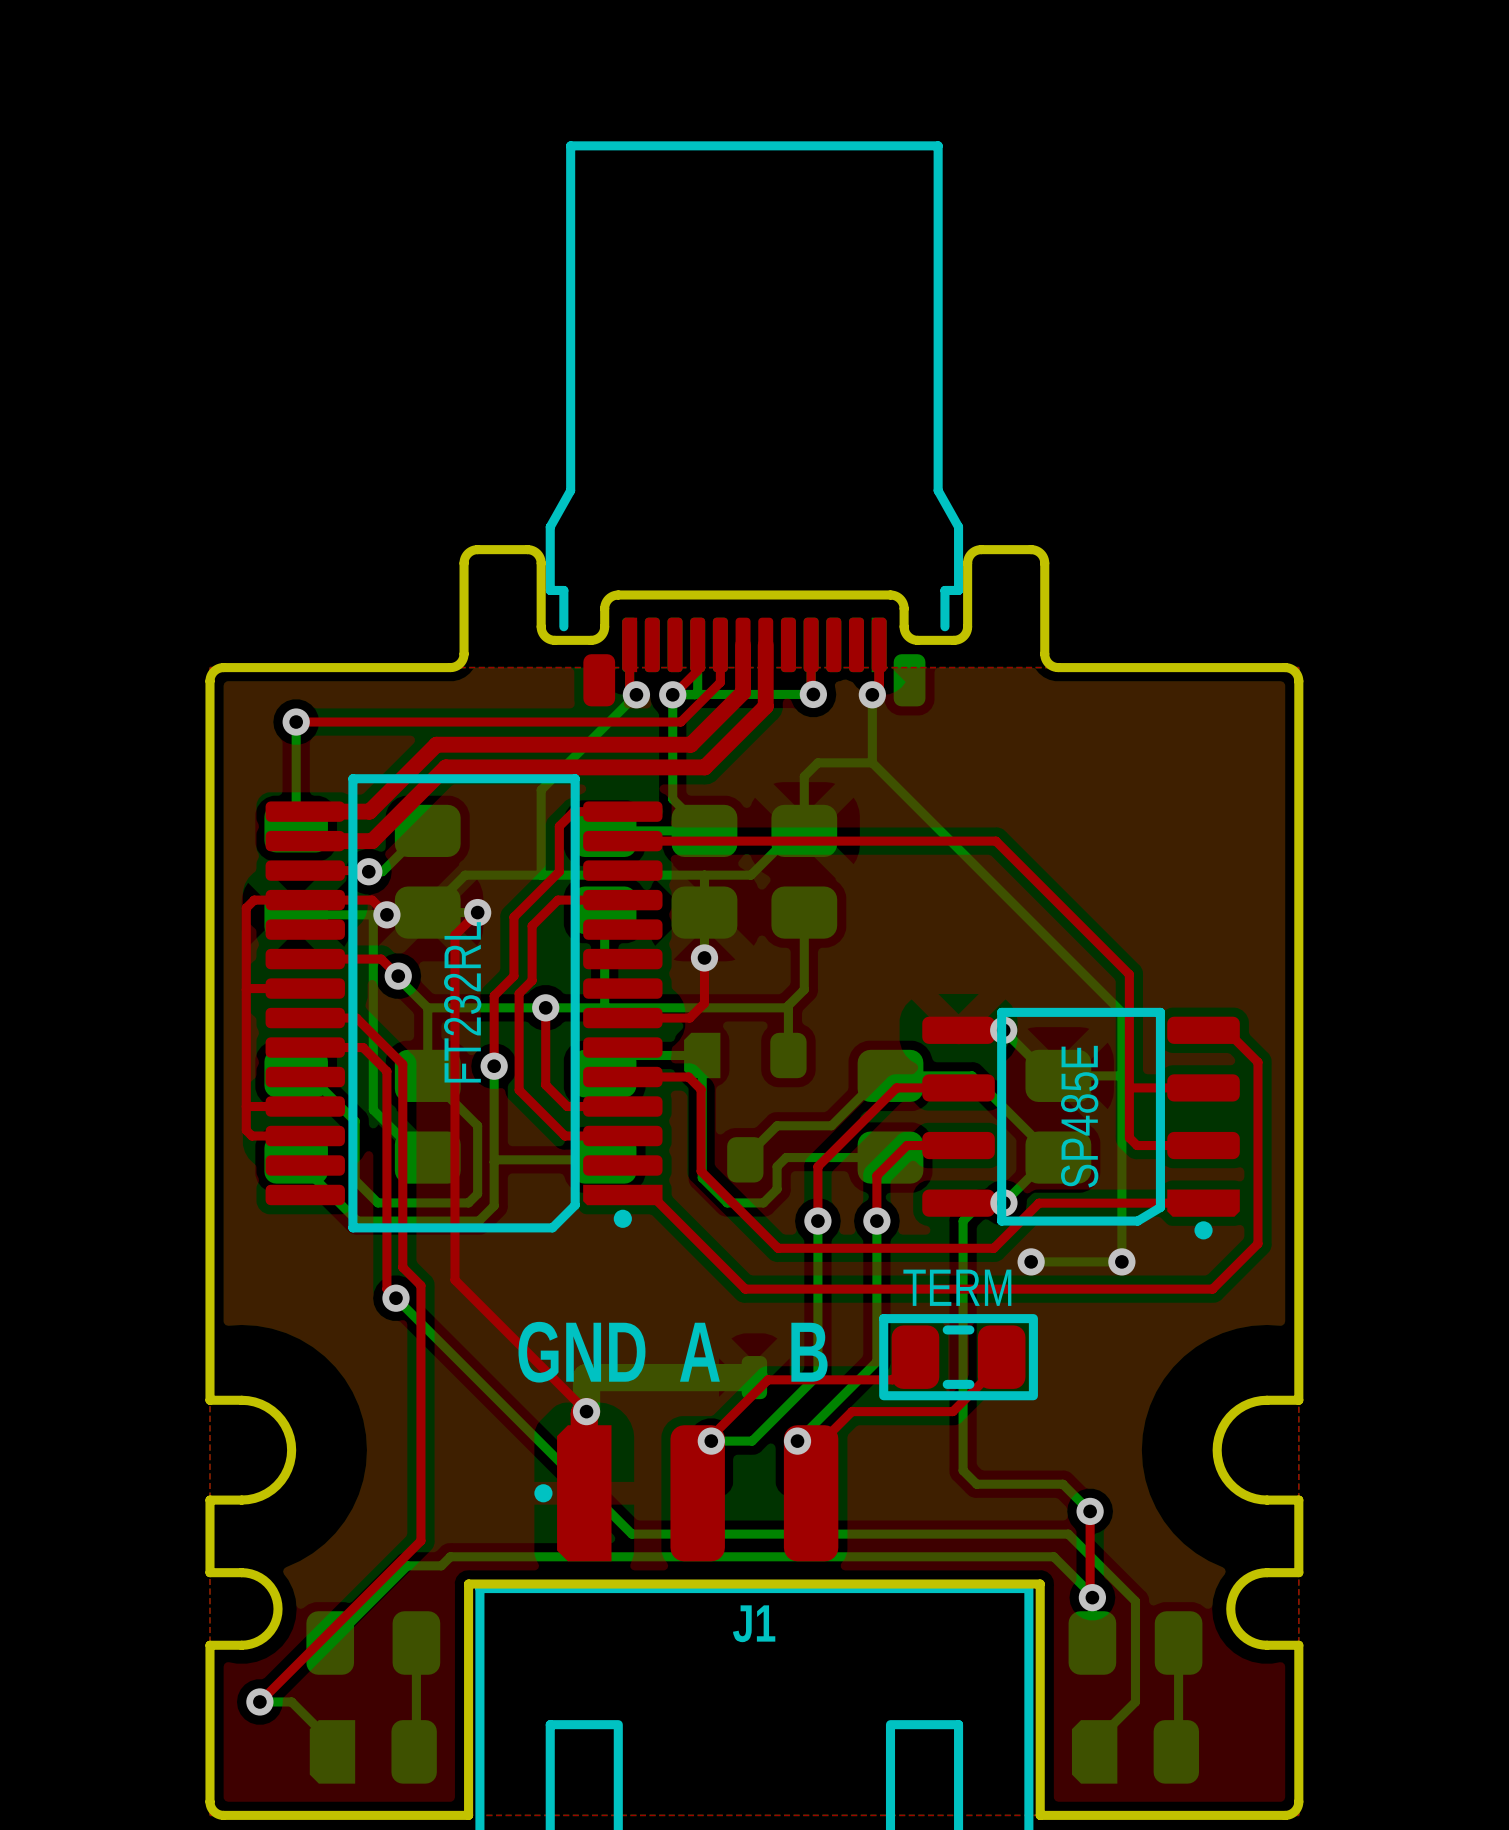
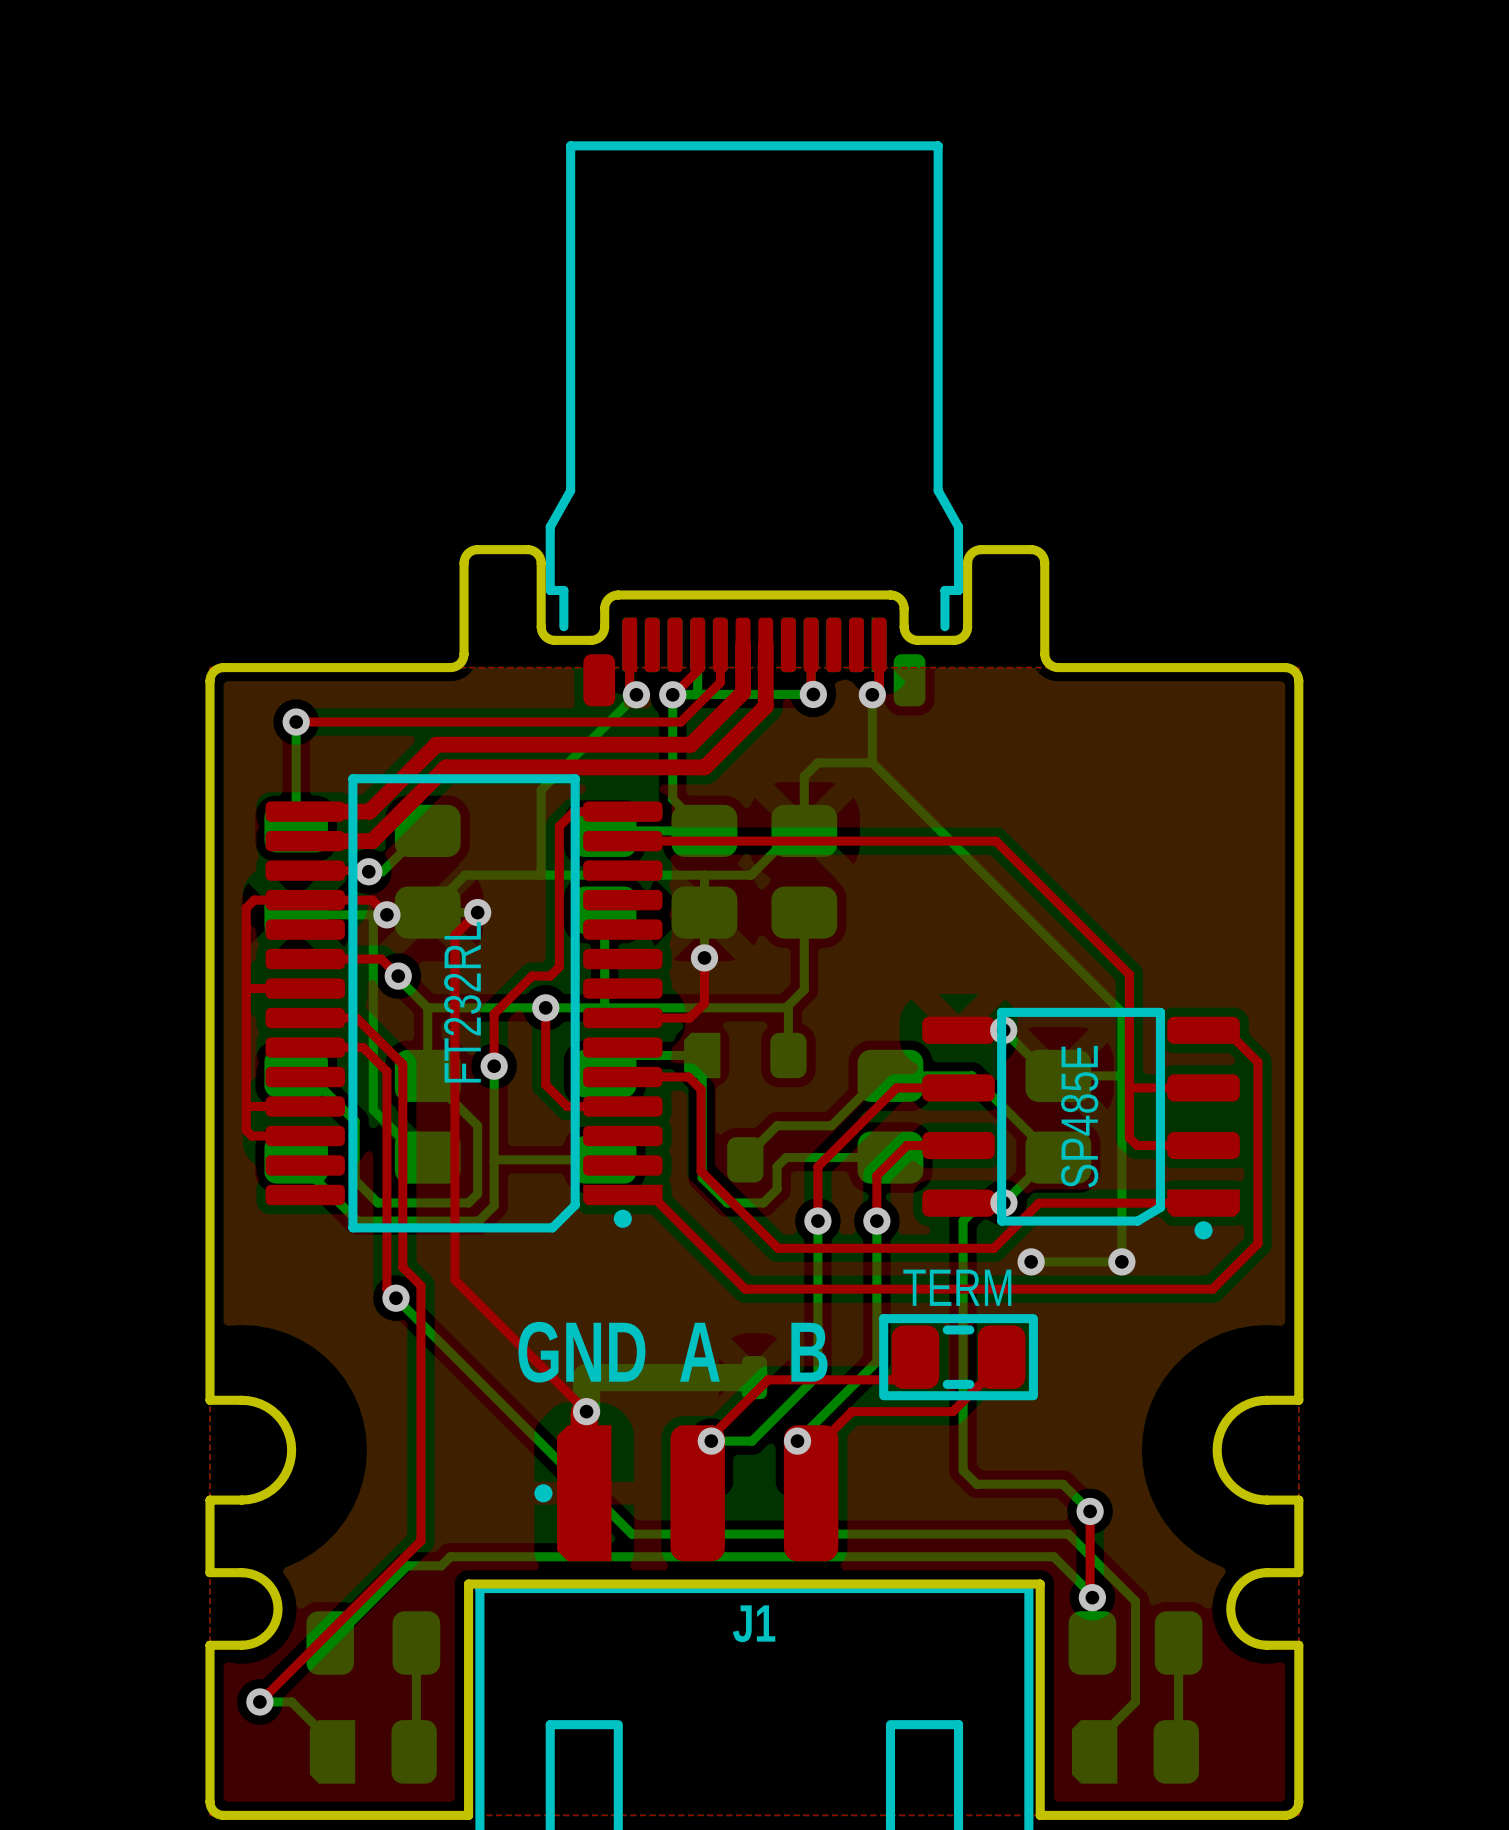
top track: (559, 871) (513, 917) (513, 976) (494, 995) (494, 1014) -> (559, 871) (559, 967) (550, 976) (532, 976) (494, 1014)
top track: (622, 900) (557, 900) (532, 925) (532, 980) (519, 993) (519, 1090) (564, 1136) (622, 1136) -> none

